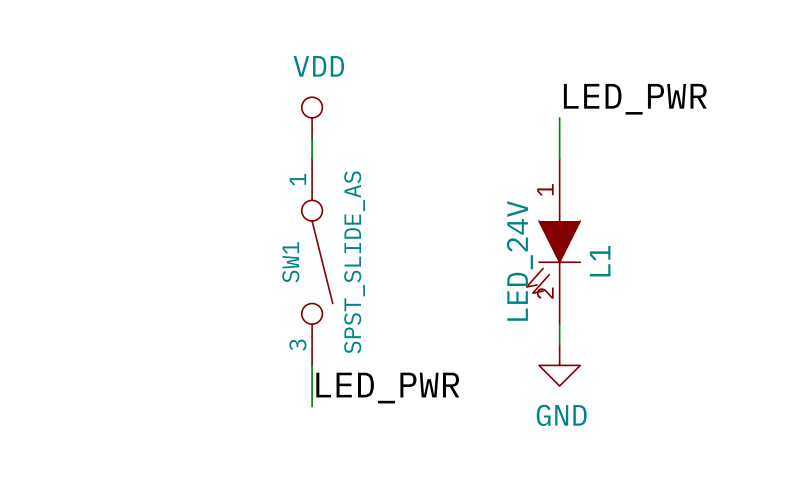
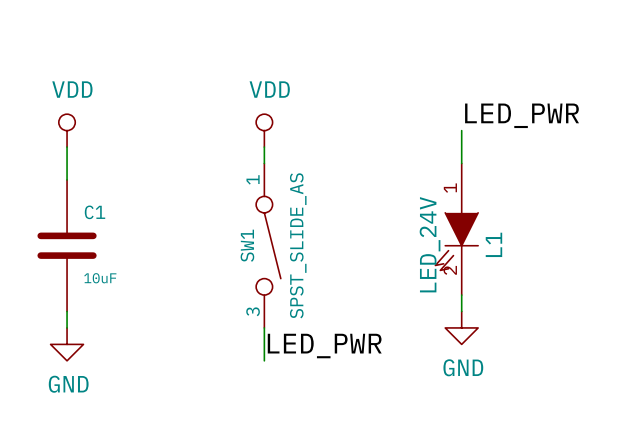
power symbol: none -> VDD (67, 130)
wire: none -> (67, 147) (67, 179)
C1: none -> 10uF (67, 245)
wire: none -> (67, 311) (67, 327)
power symbol: none -> GND (67, 344)

